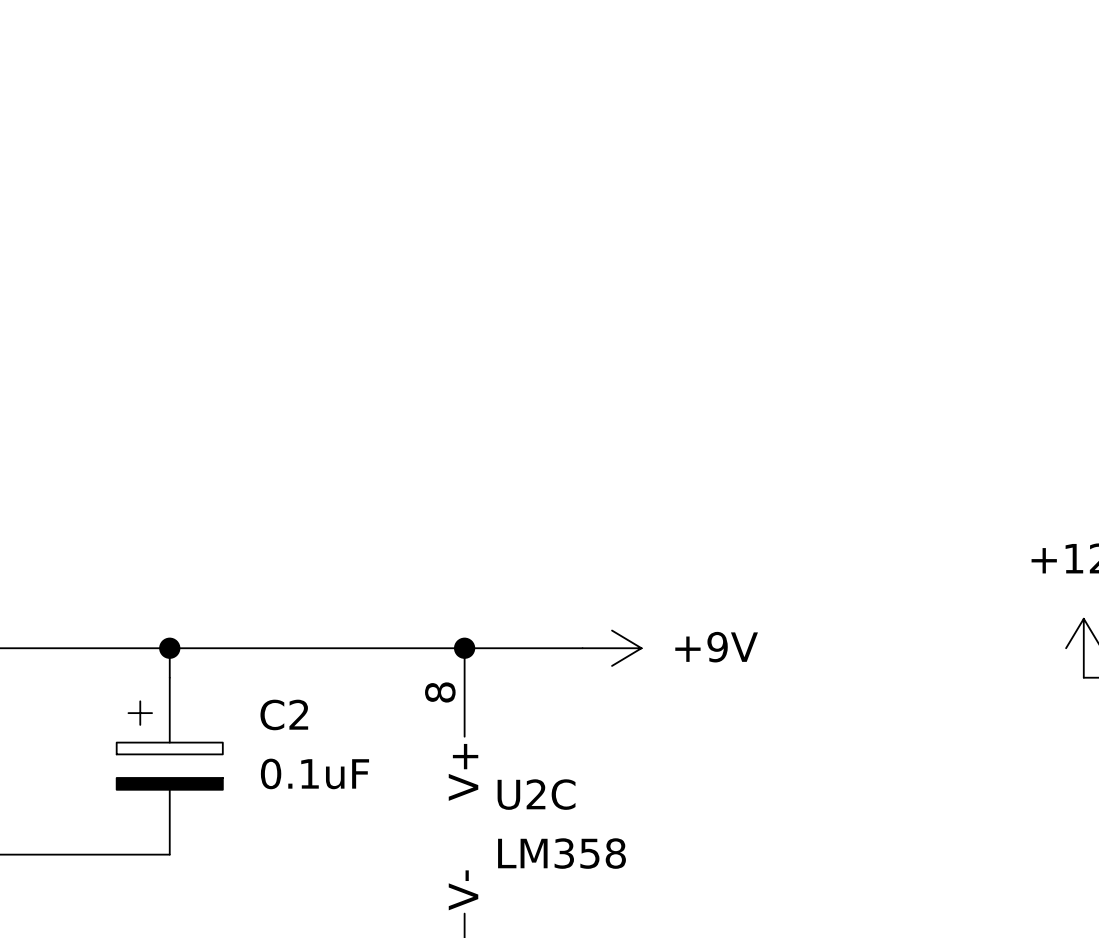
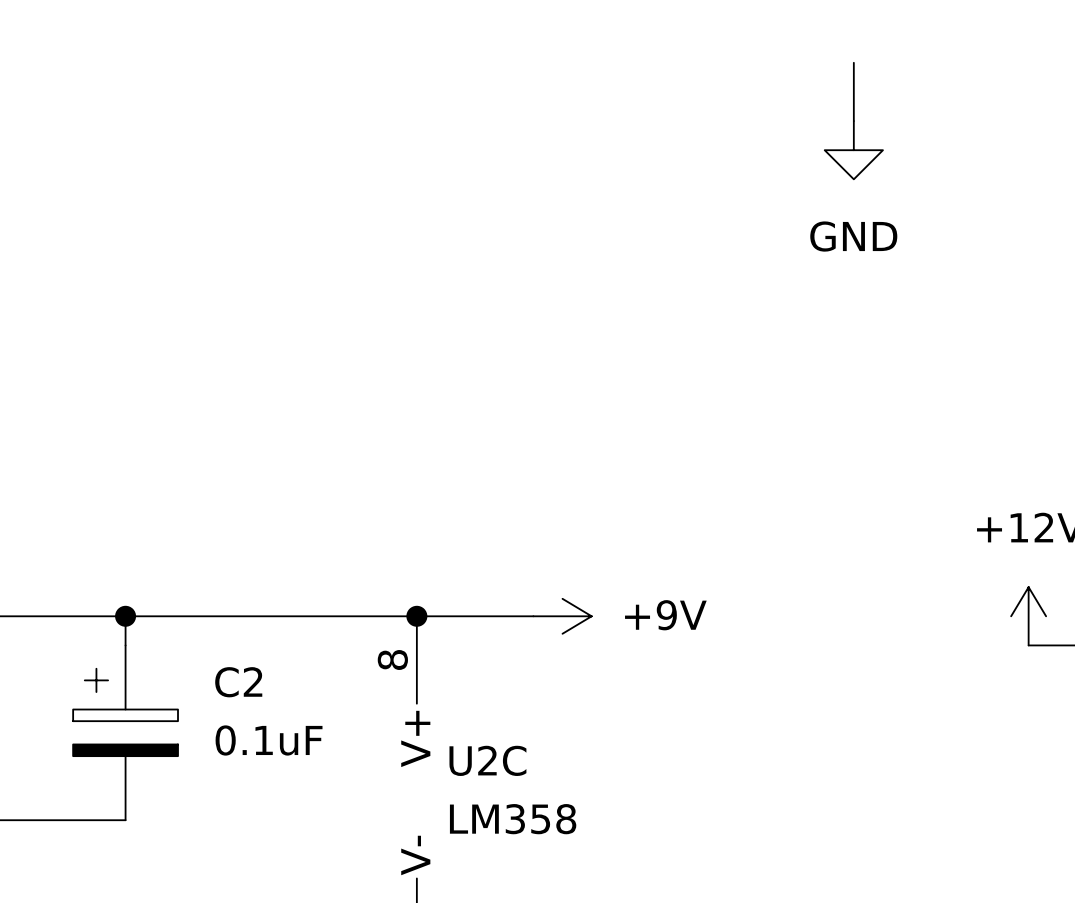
wire: none -> (853, 62) (853, 121)
power symbol: none -> GND (853, 150)

